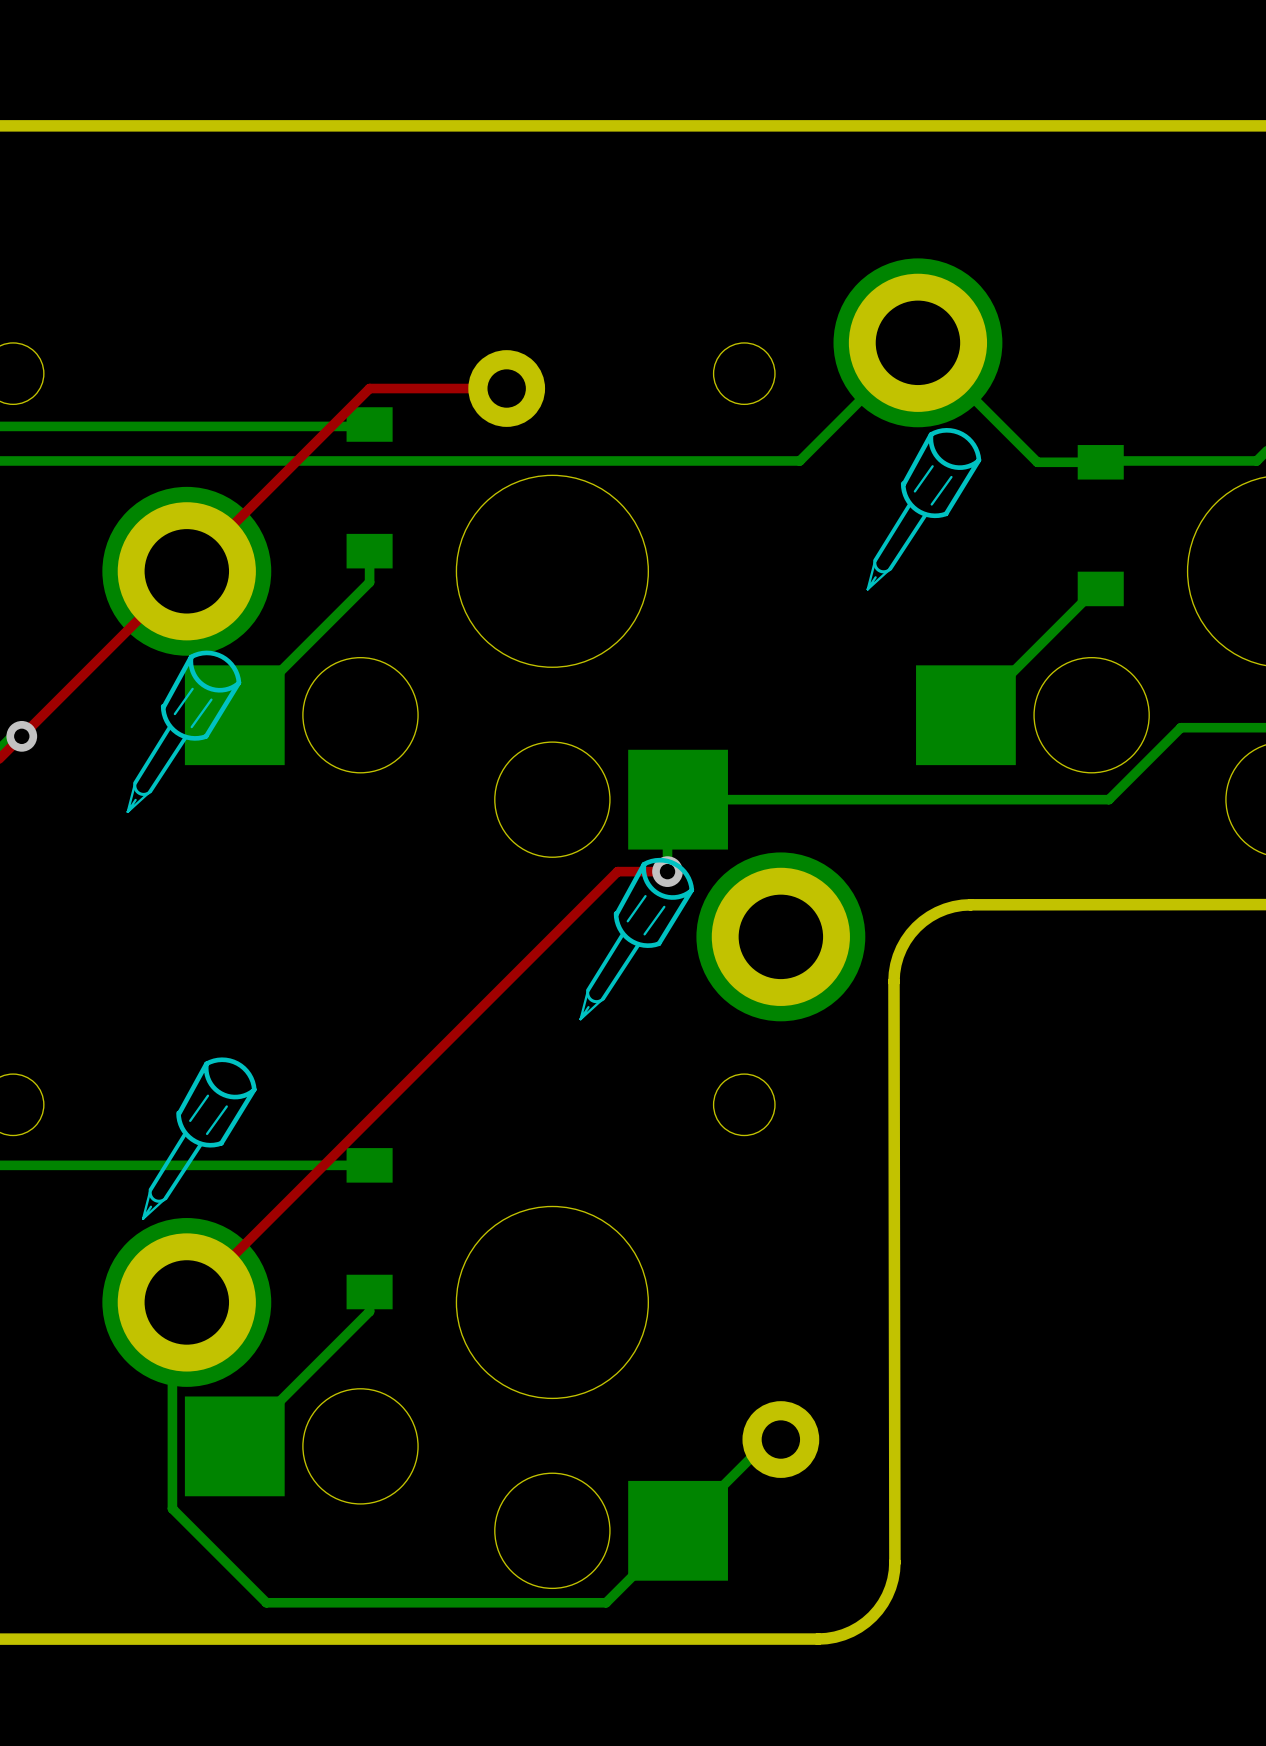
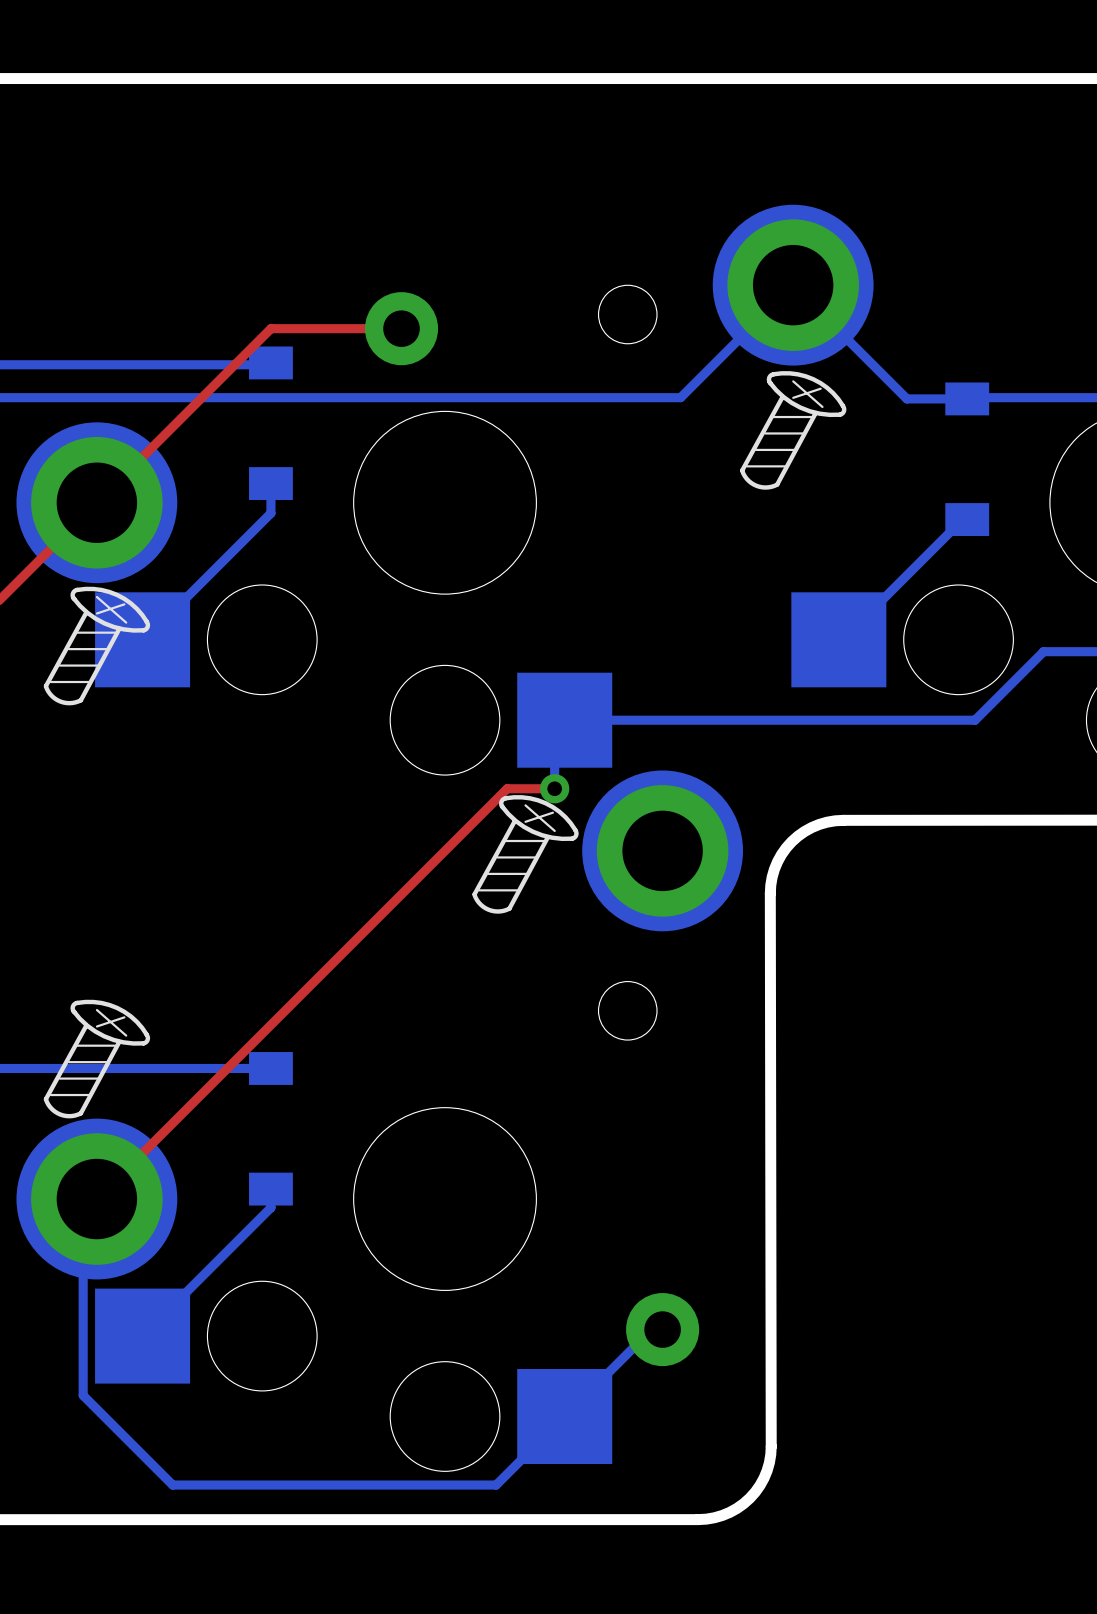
drawing shape: [866, 428, 982, 591] -> [739, 371, 847, 490]
drawing shape: [126, 650, 242, 814] -> [43, 586, 151, 706]
drawing shape: [579, 857, 695, 1021] -> [472, 795, 579, 914]
drawing shape: [141, 1057, 257, 1220] -> [43, 999, 151, 1119]

